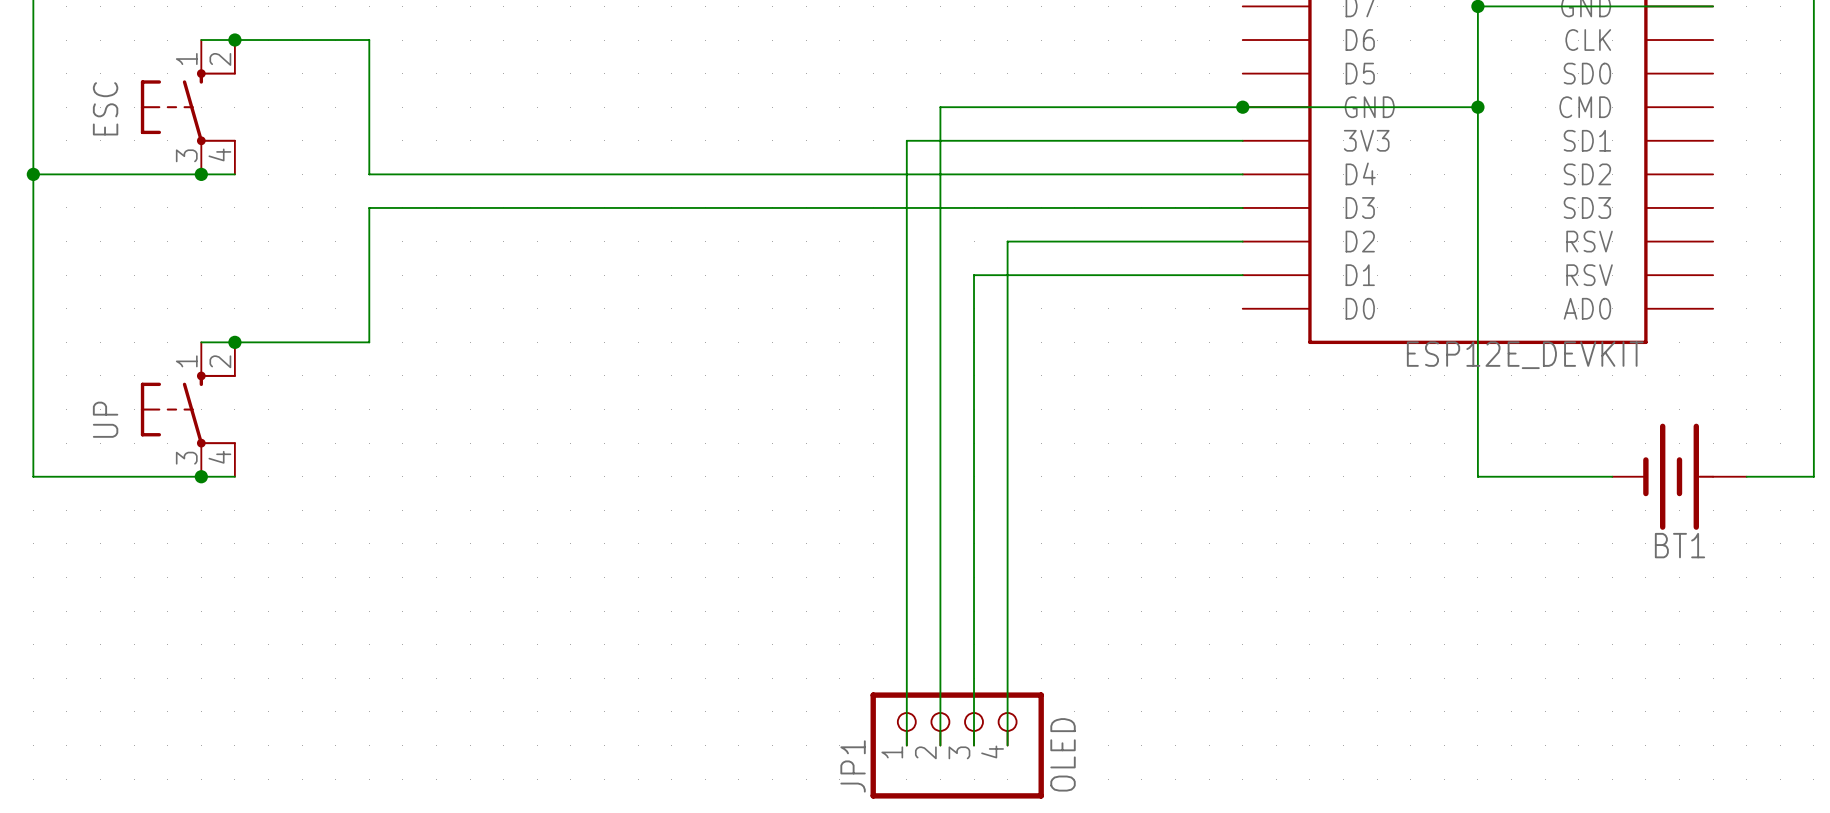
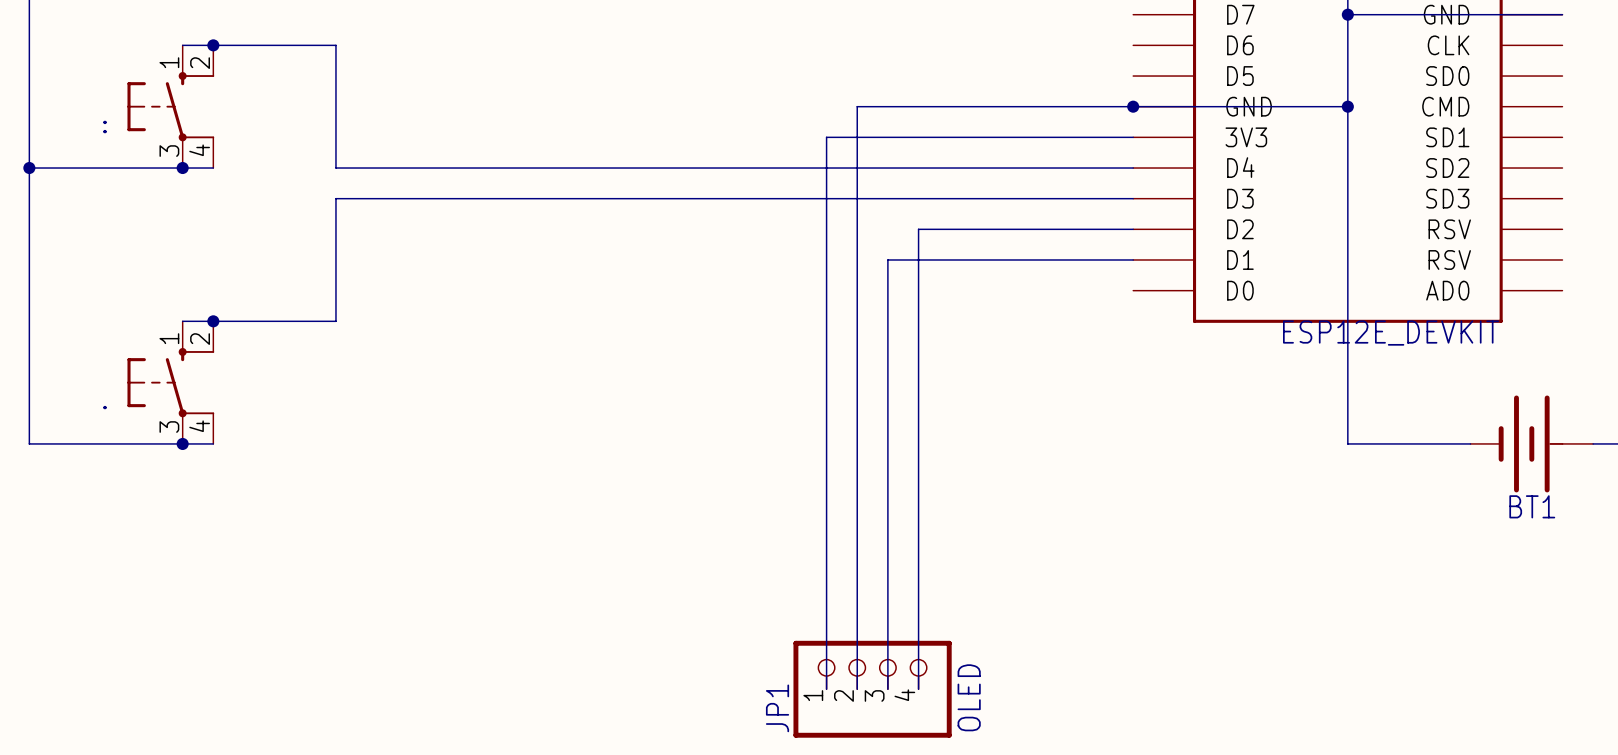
ESC name: ESC (105, 108) -> .. (104, 127)
UP name: UP (105, 419) -> . (104, 407)

